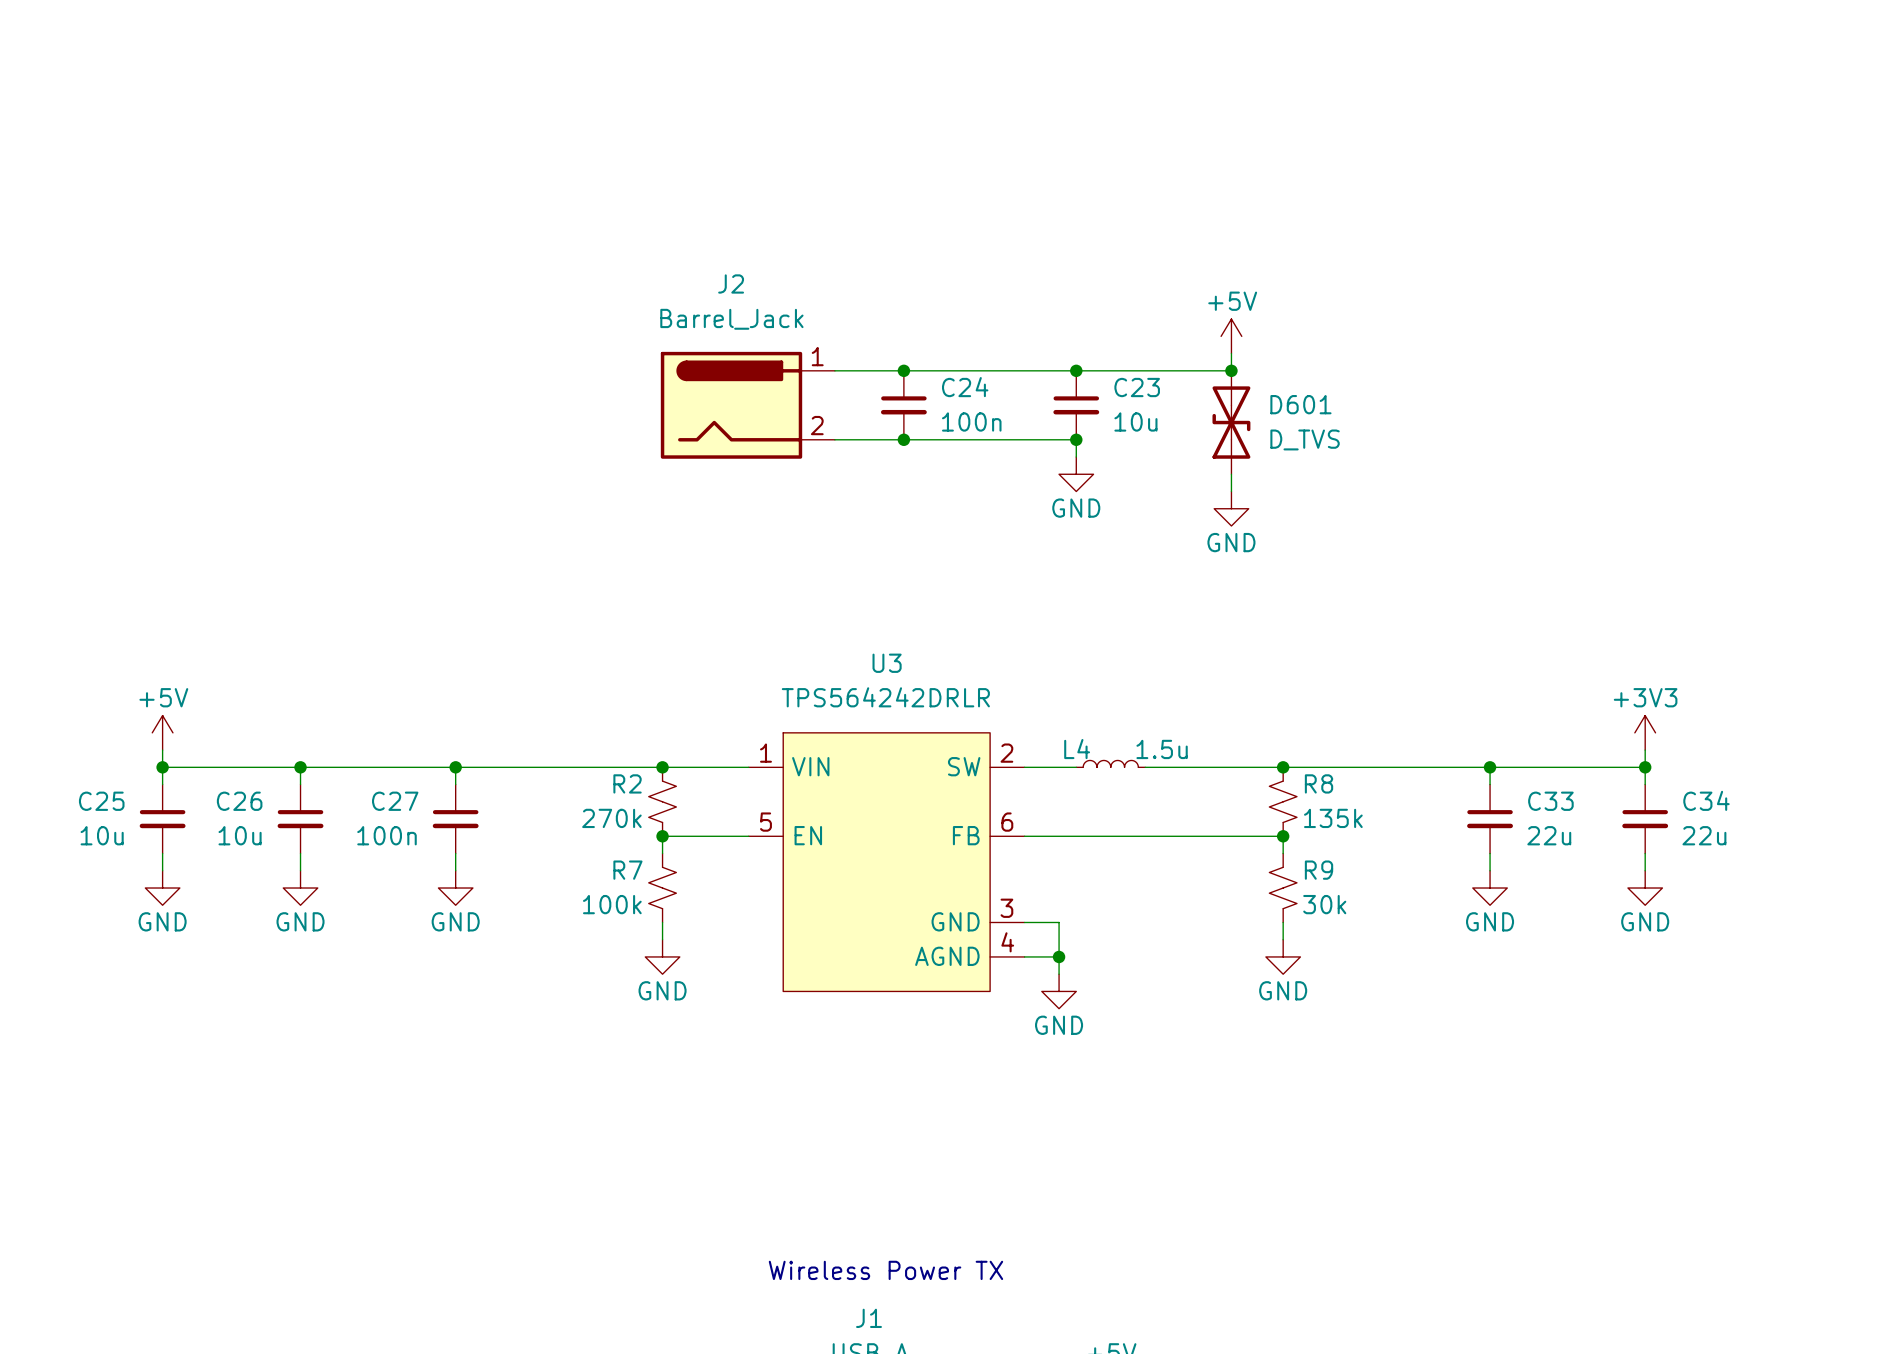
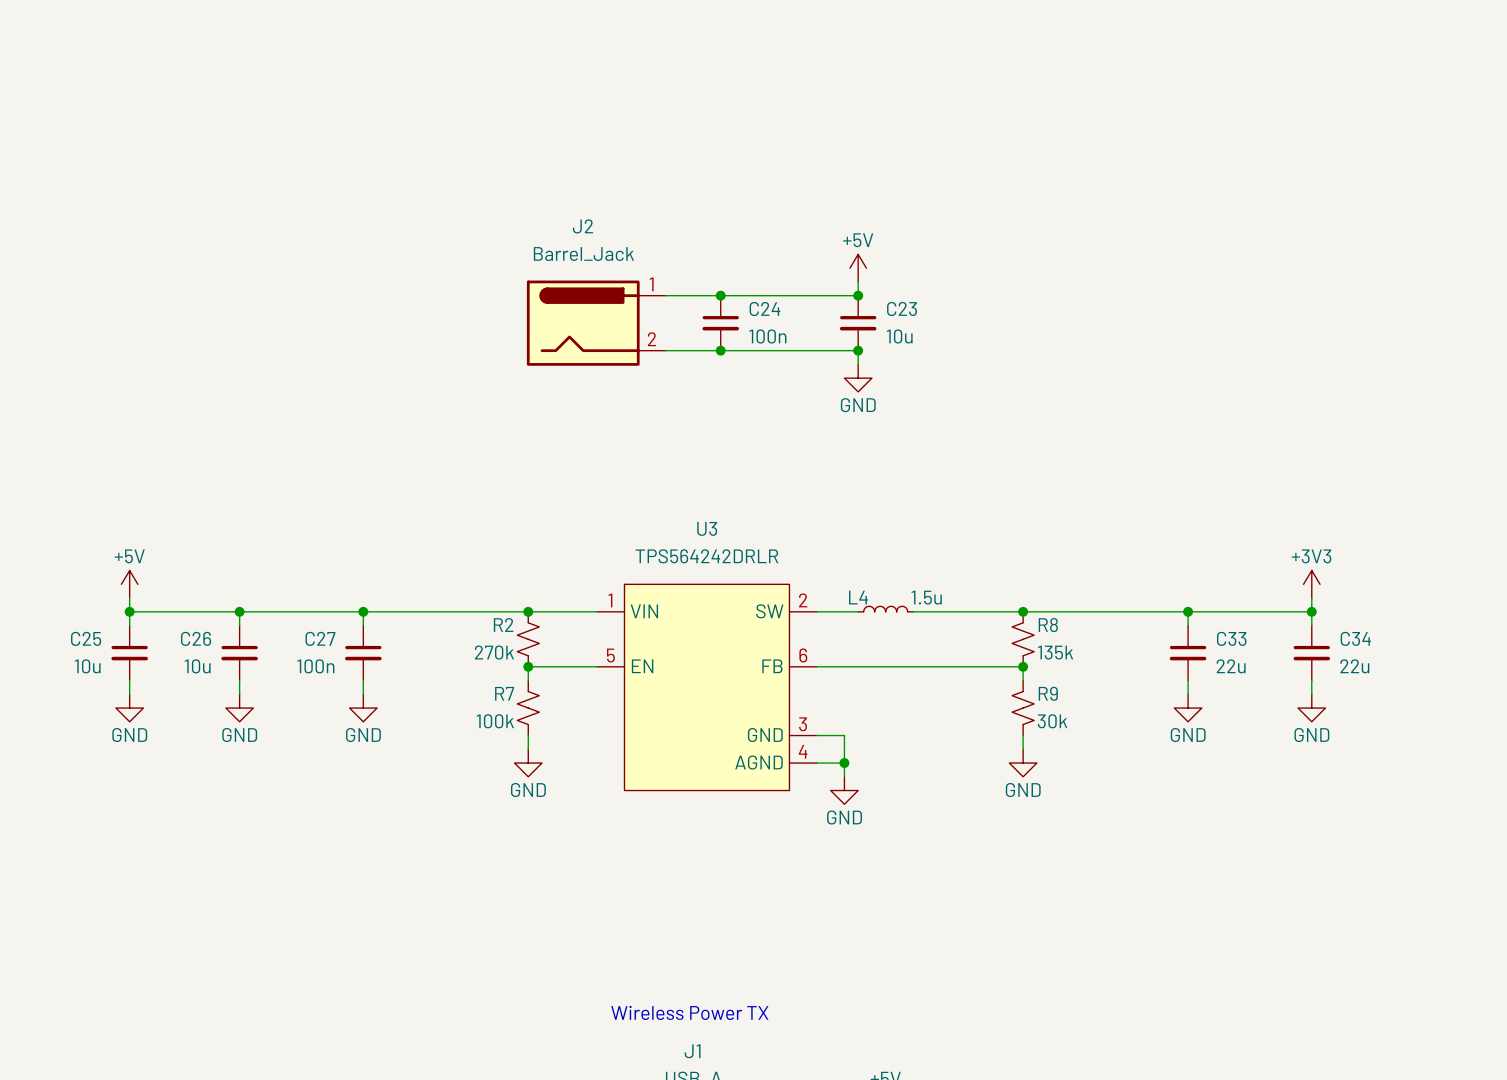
power symbol position: +5V (1231, 336) -> +5V (858, 268)
wire: (1231, 353) (1231, 370) (1076, 370) -> (858, 281) (858, 295)
junction: (1231, 370) -> none
D601: D_TVS (1231, 422) -> none
wire: (1231, 474) (1231, 491) -> none
power symbol: GND (1231, 508) -> none

